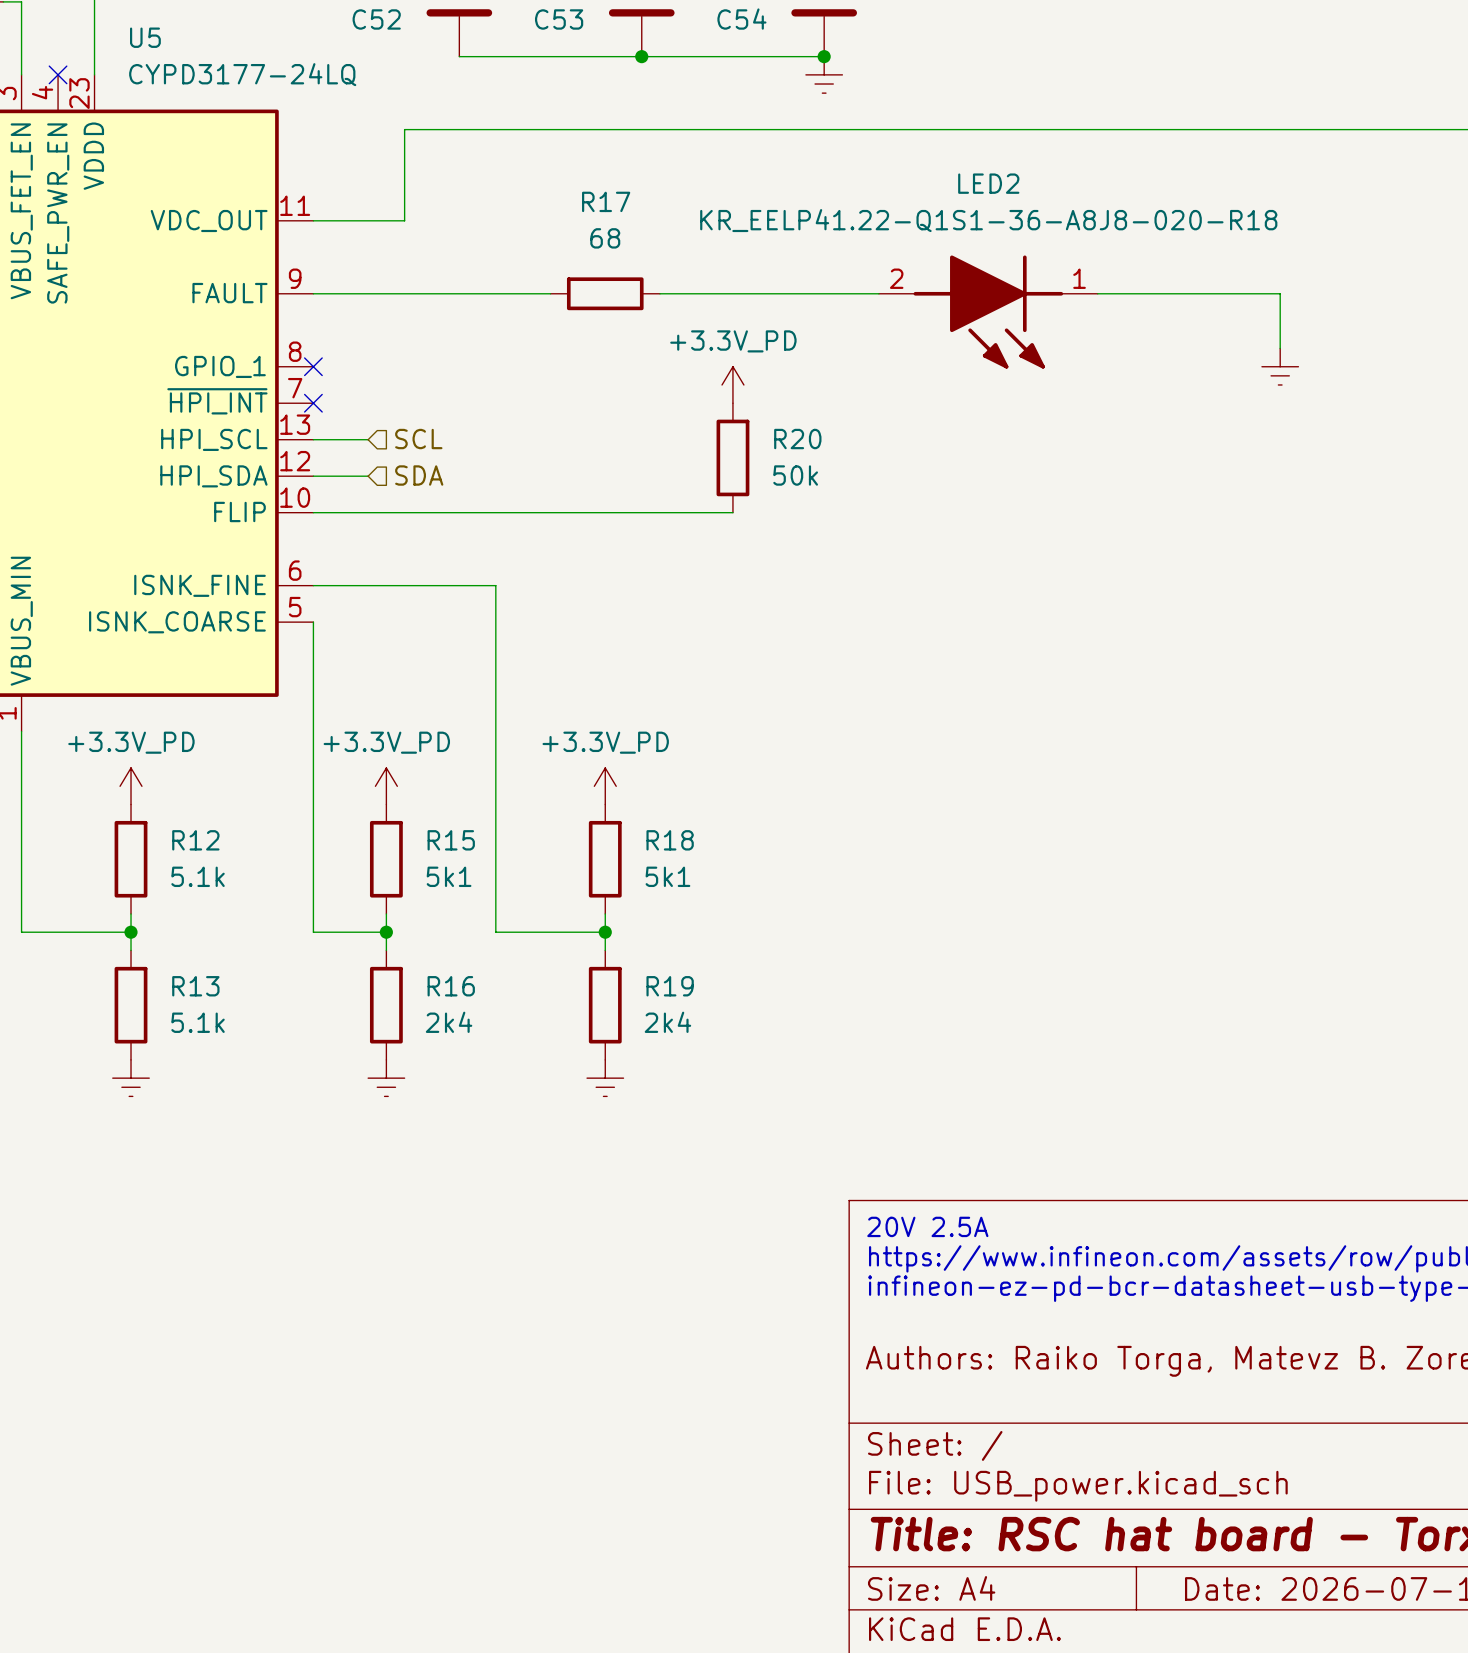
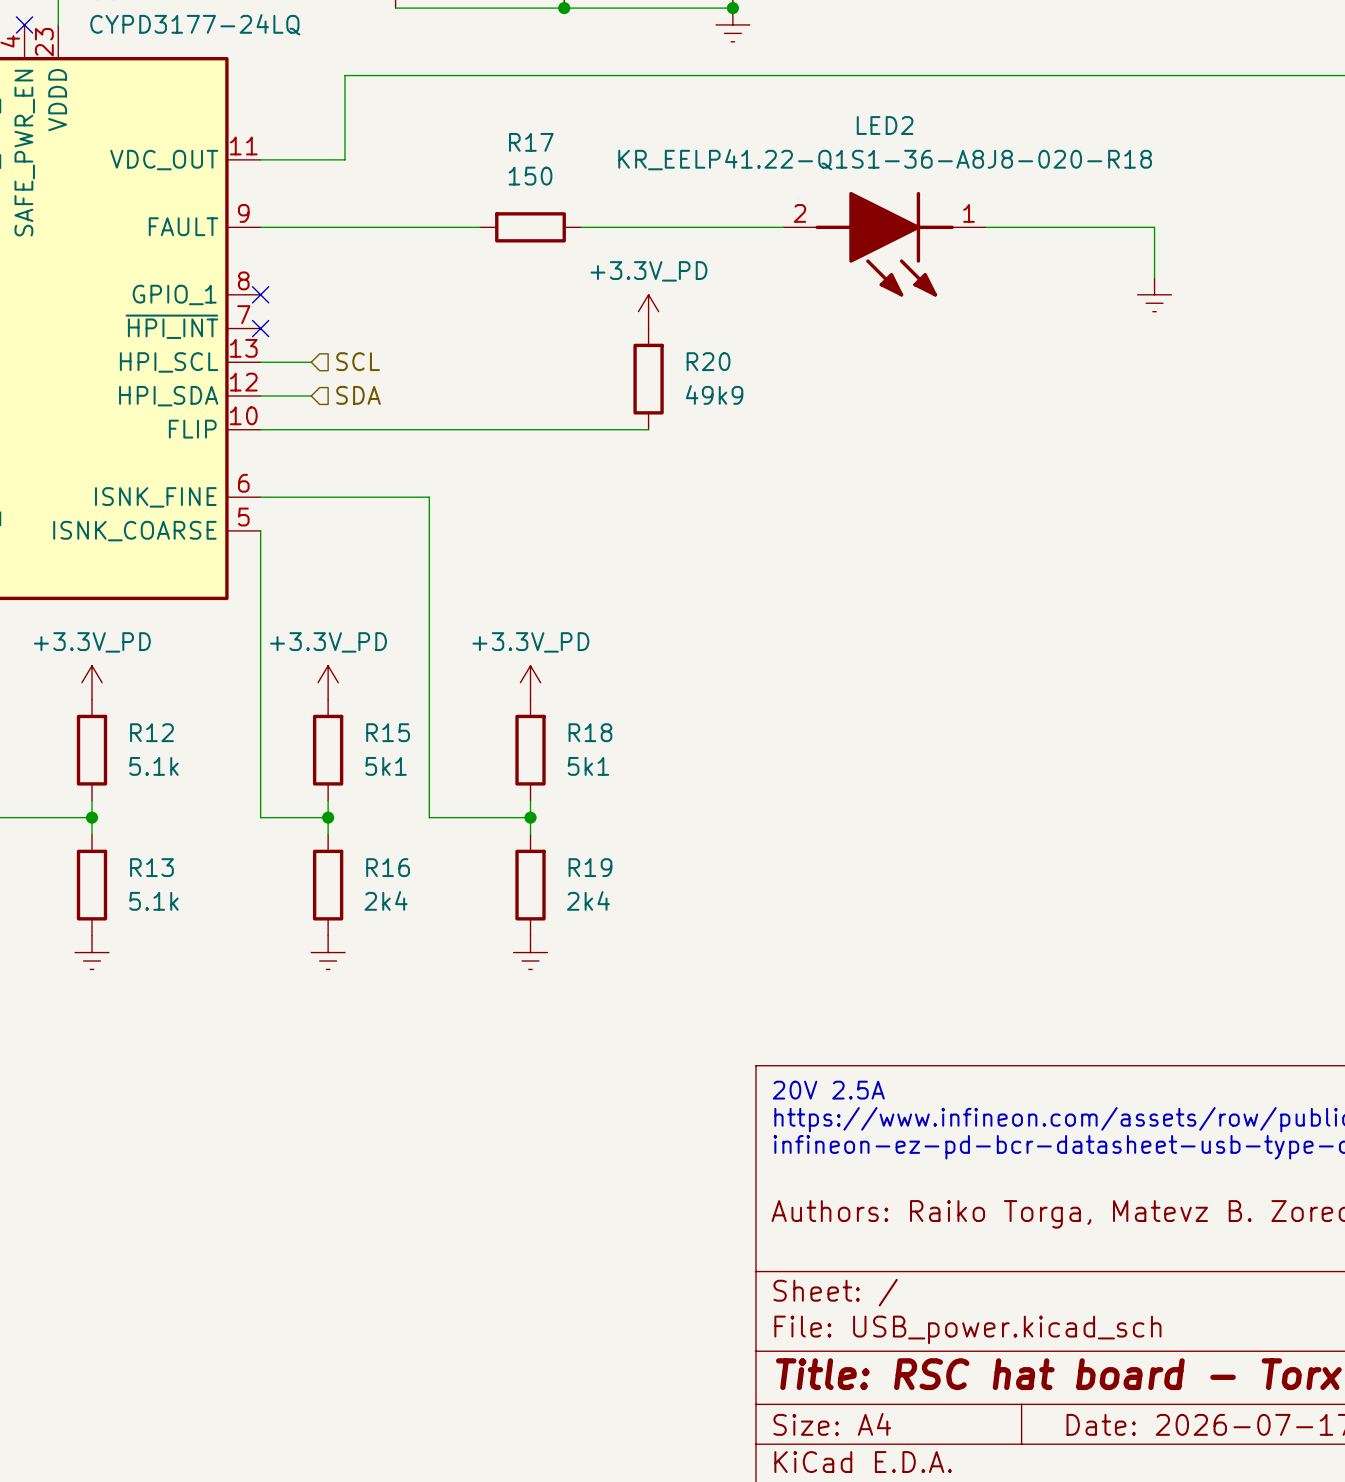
R17 value: 68 (605, 238) -> 150 (530, 176)
R20 value: 50k (795, 475) -> 49k9 (714, 394)

